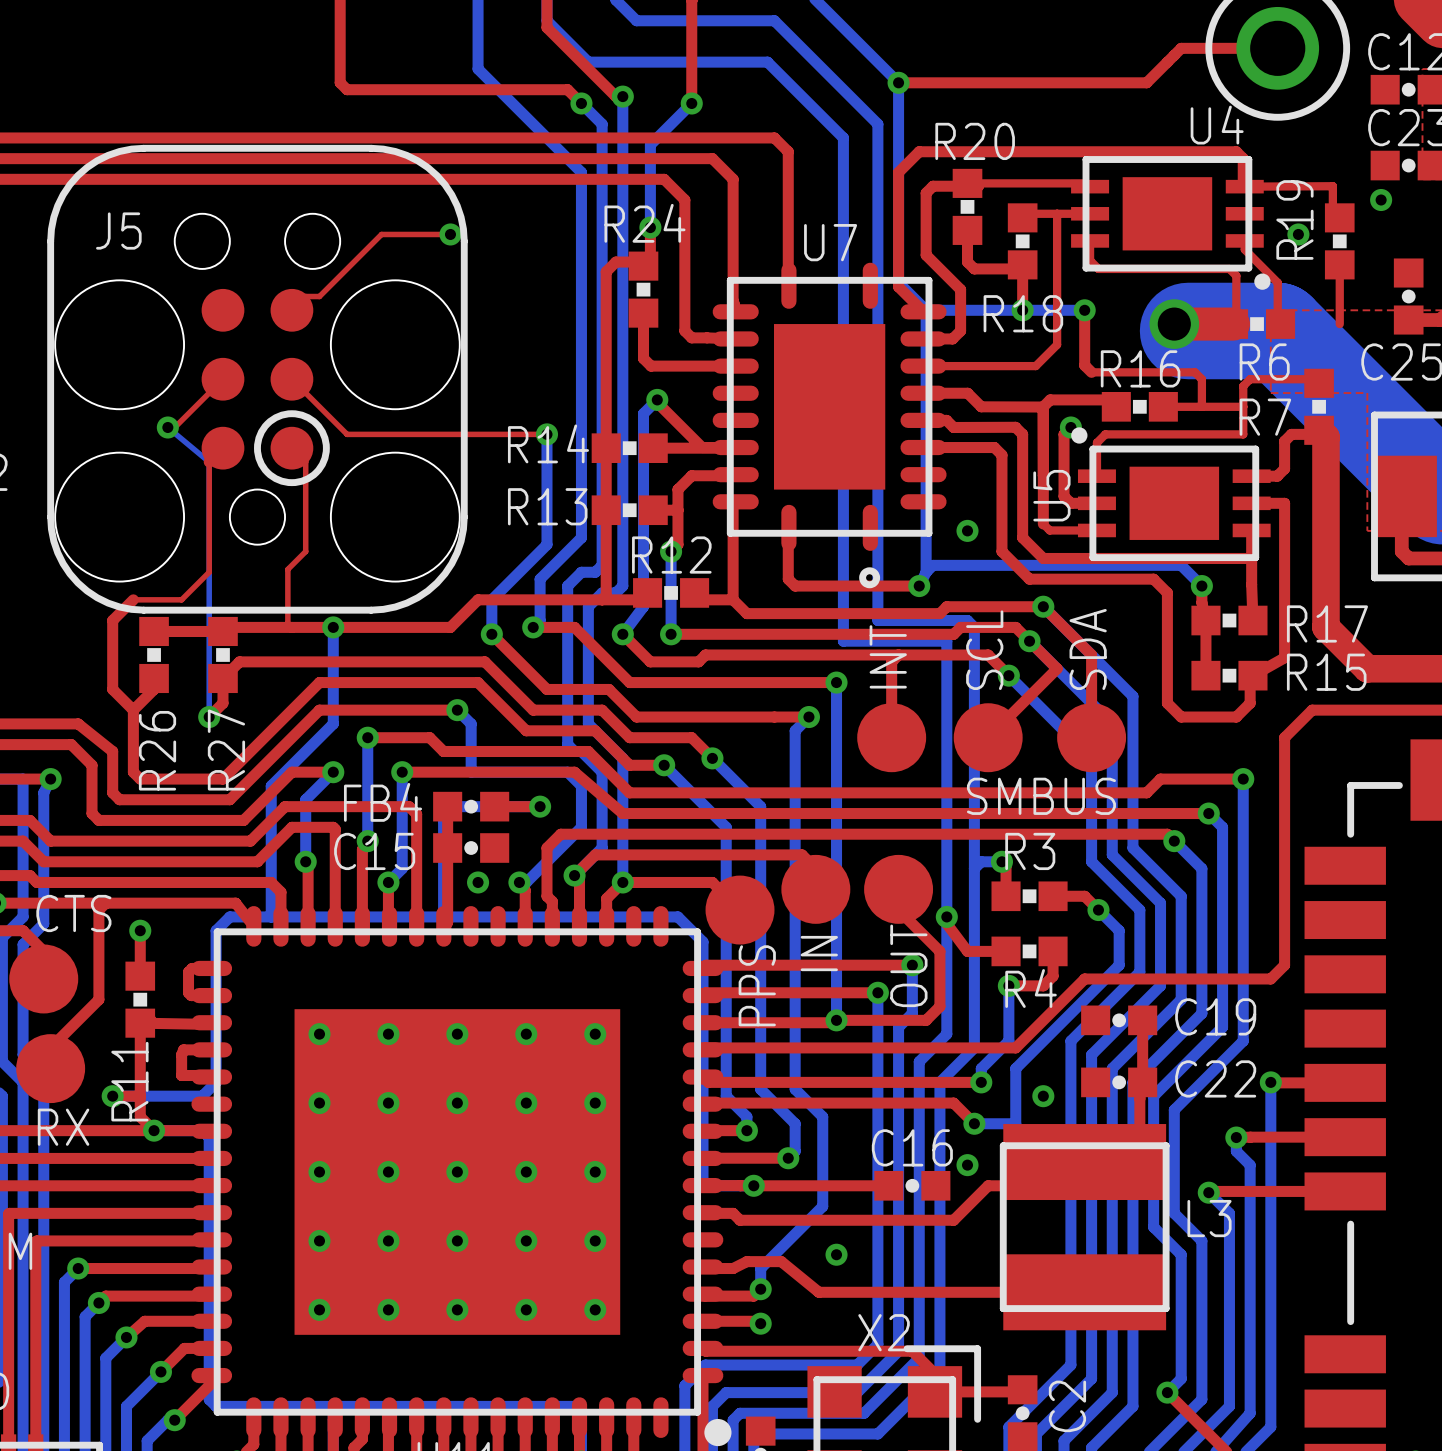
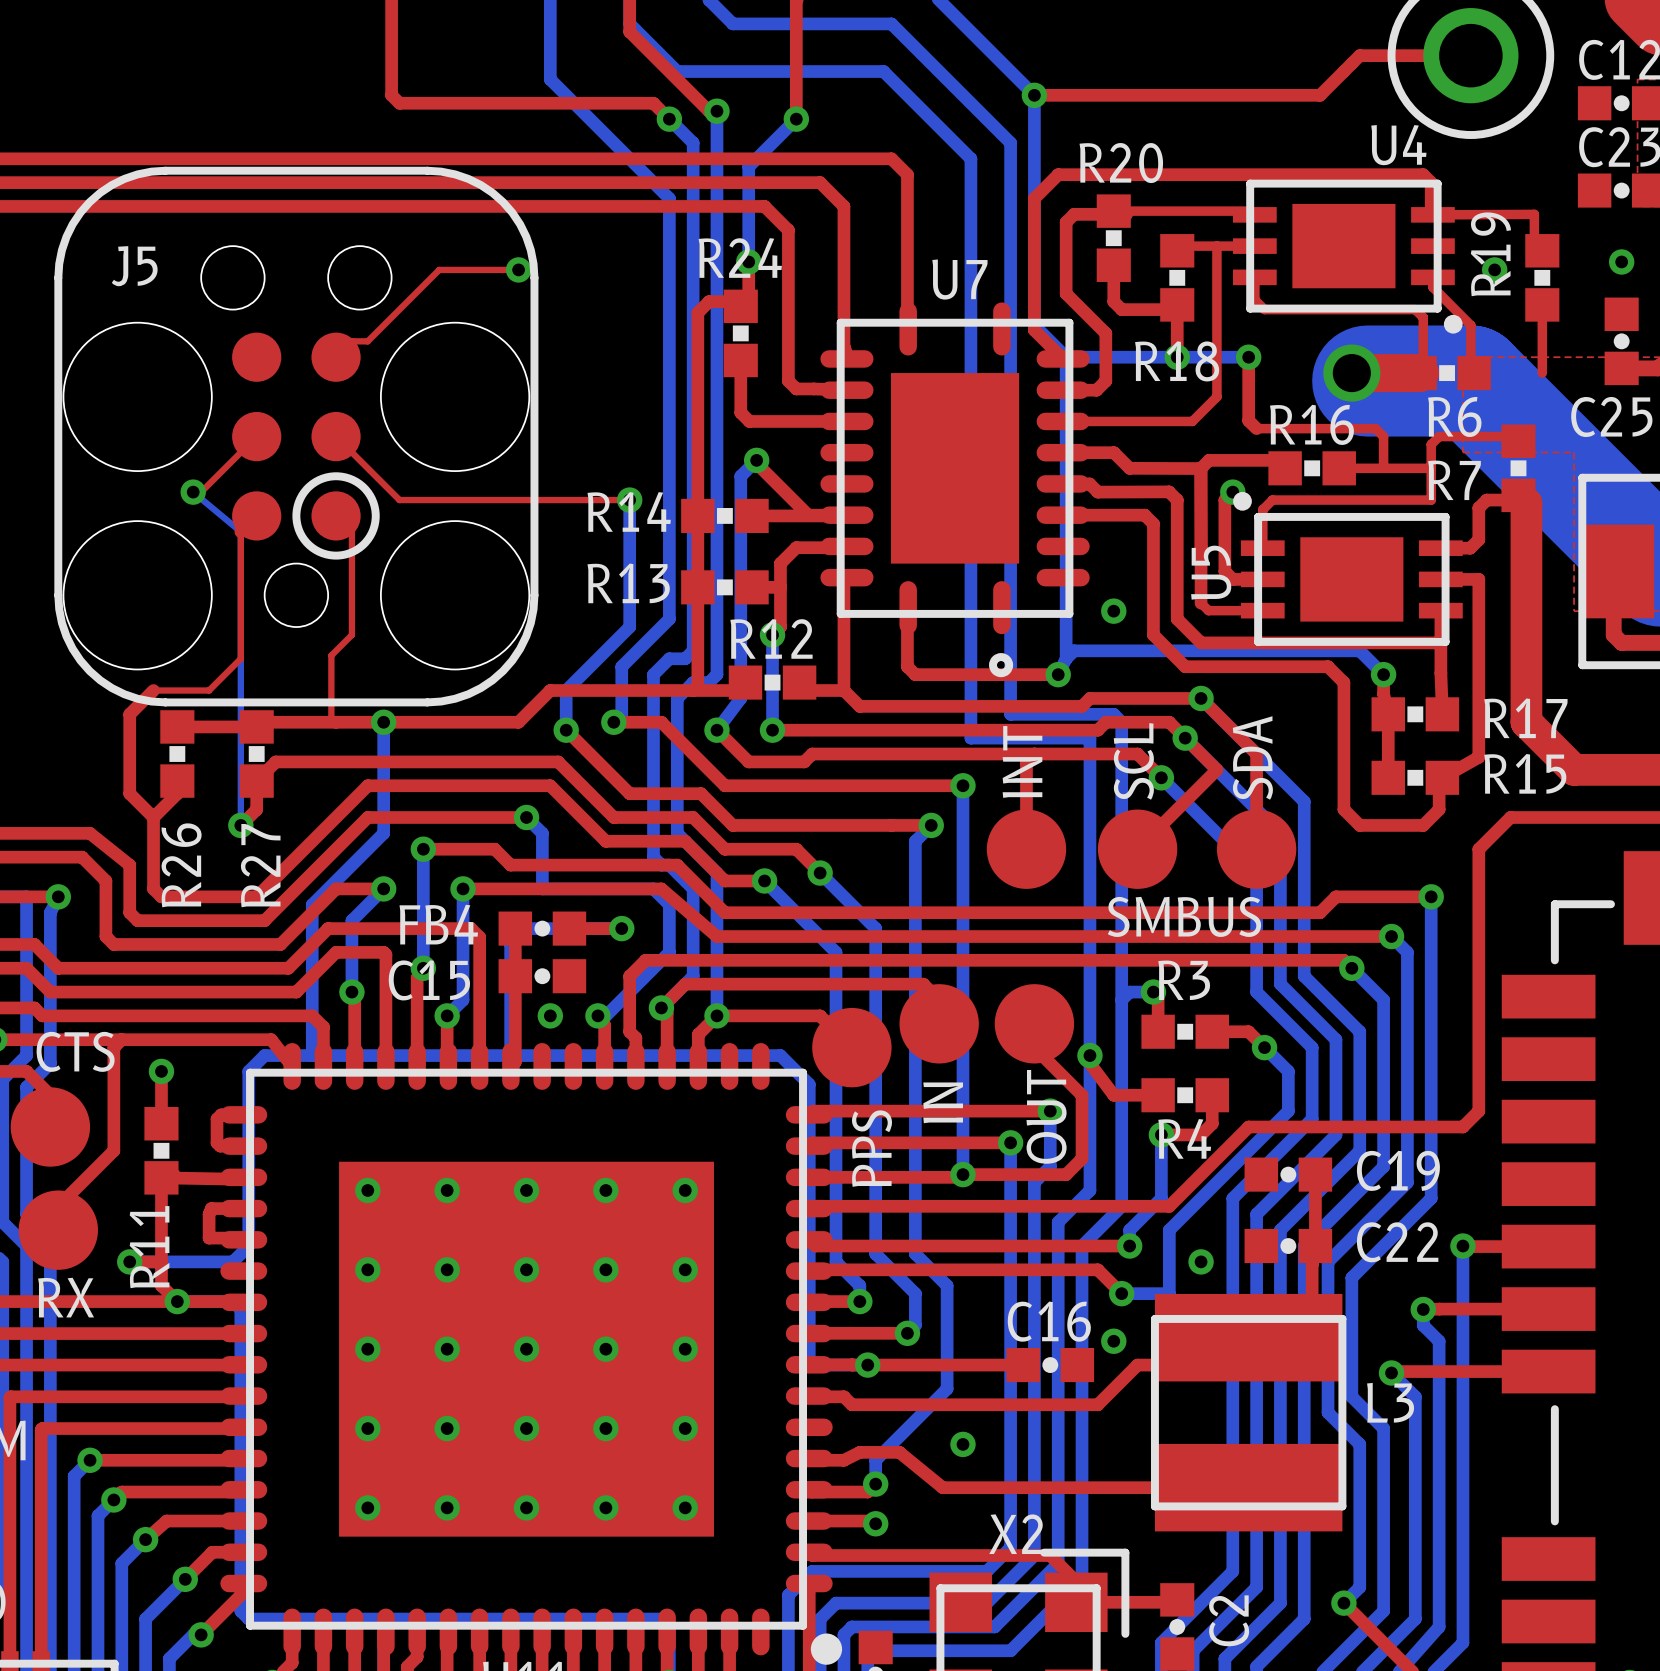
via position: (1381, 200) -> (1621, 261)

